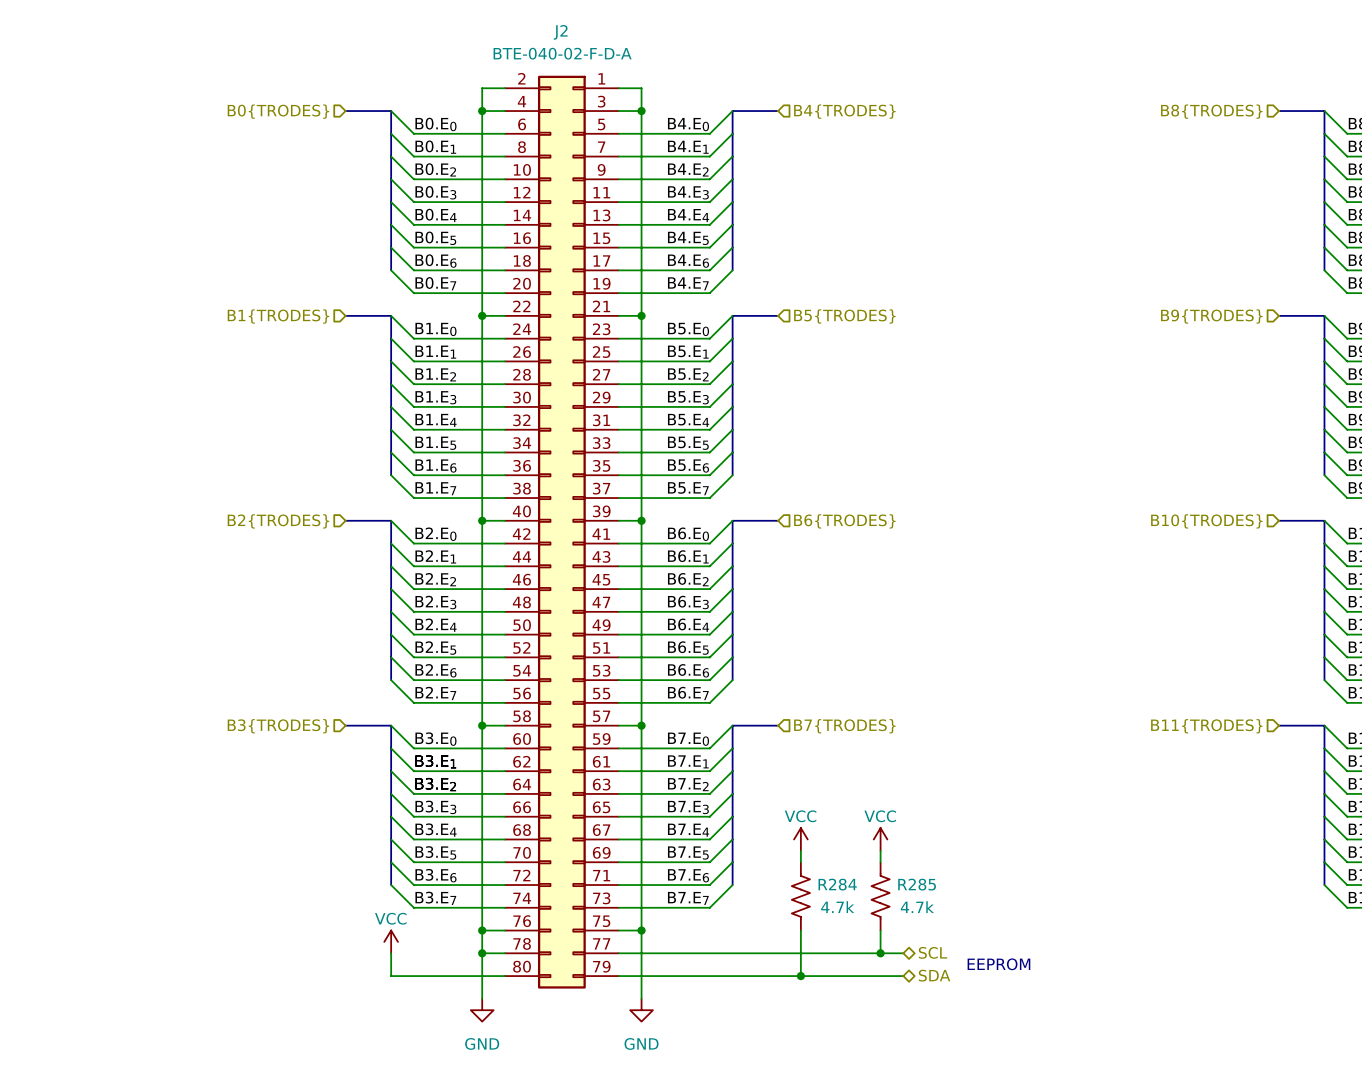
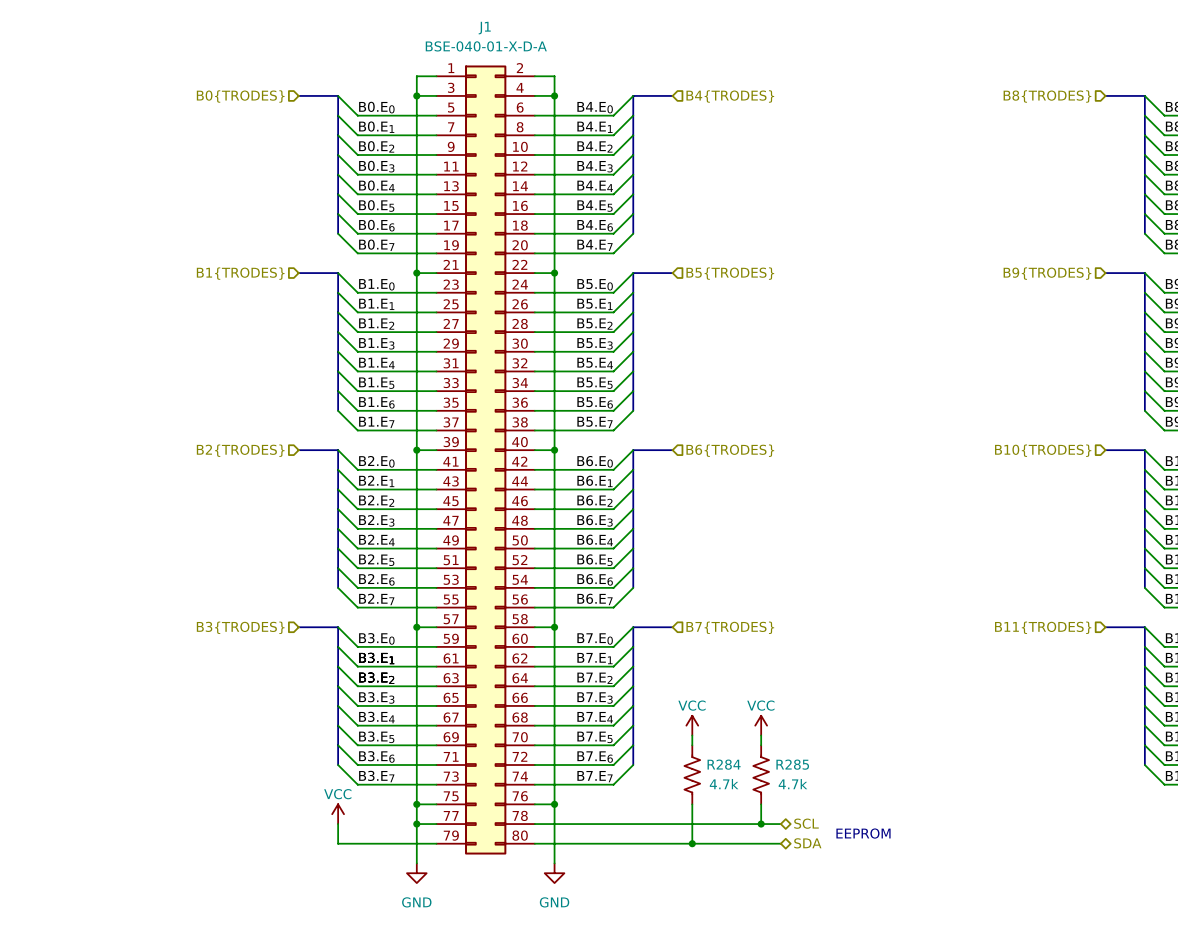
J2 name: J2 (560, 32) -> J1 (484, 28)
J2 value: BTE-040-02-F-D-A (562, 53) -> BSE-040-01-X-D-A (486, 46)
J2 flip: as is (561, 532) -> left-right (485, 460)

